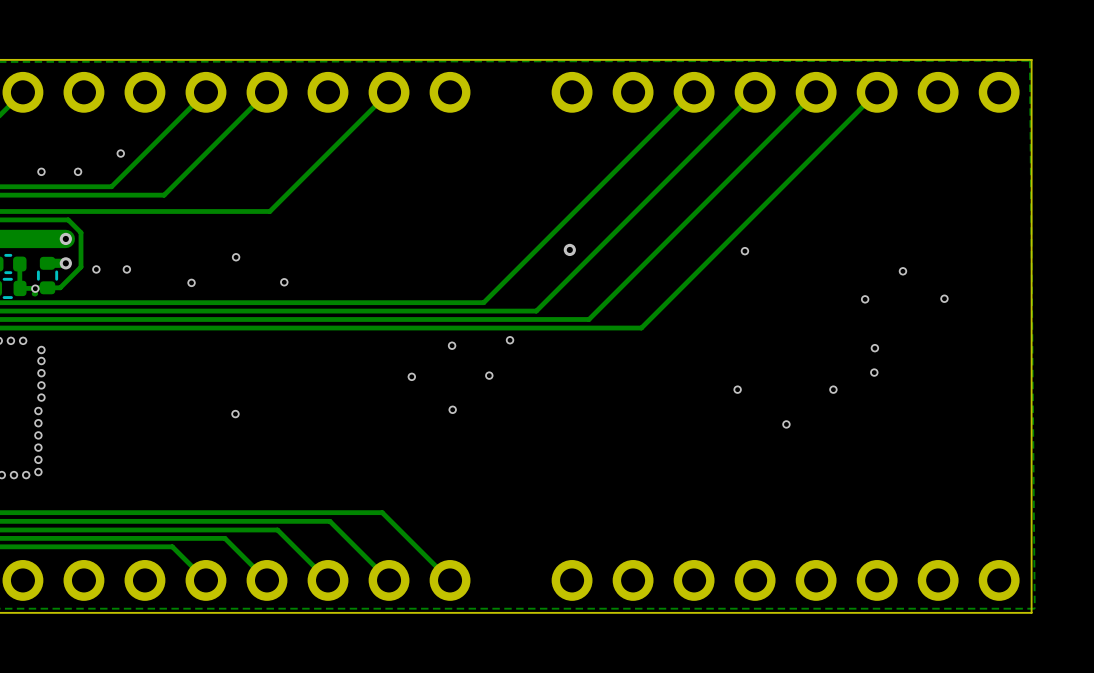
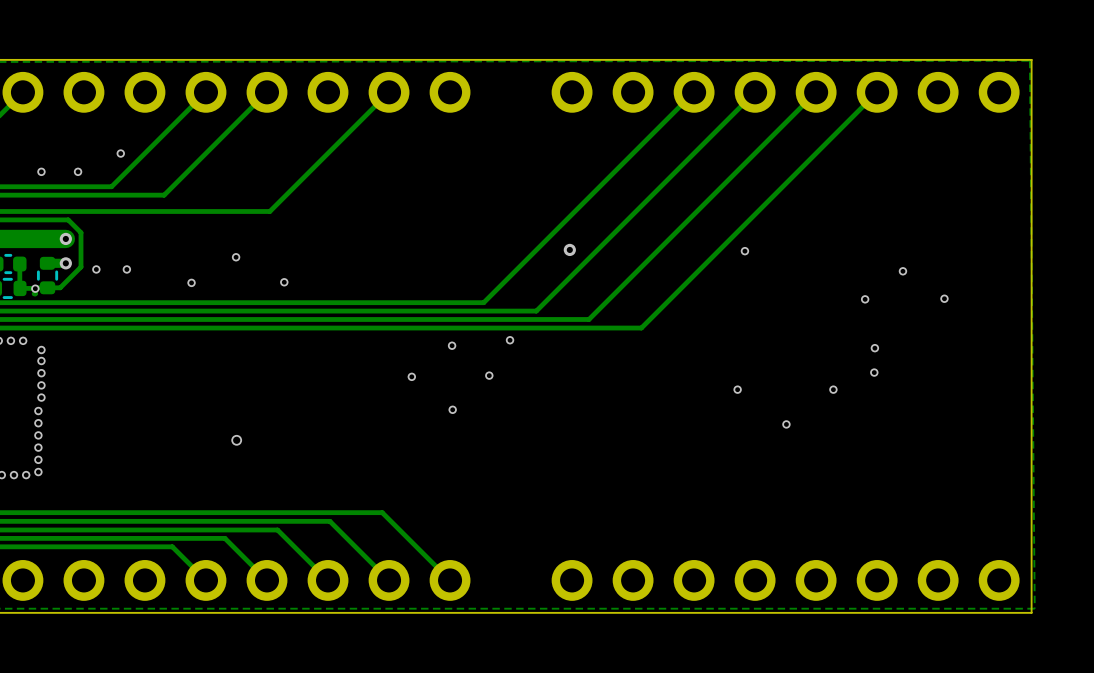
via: (235, 414) -> none
via: none -> (236, 440)

